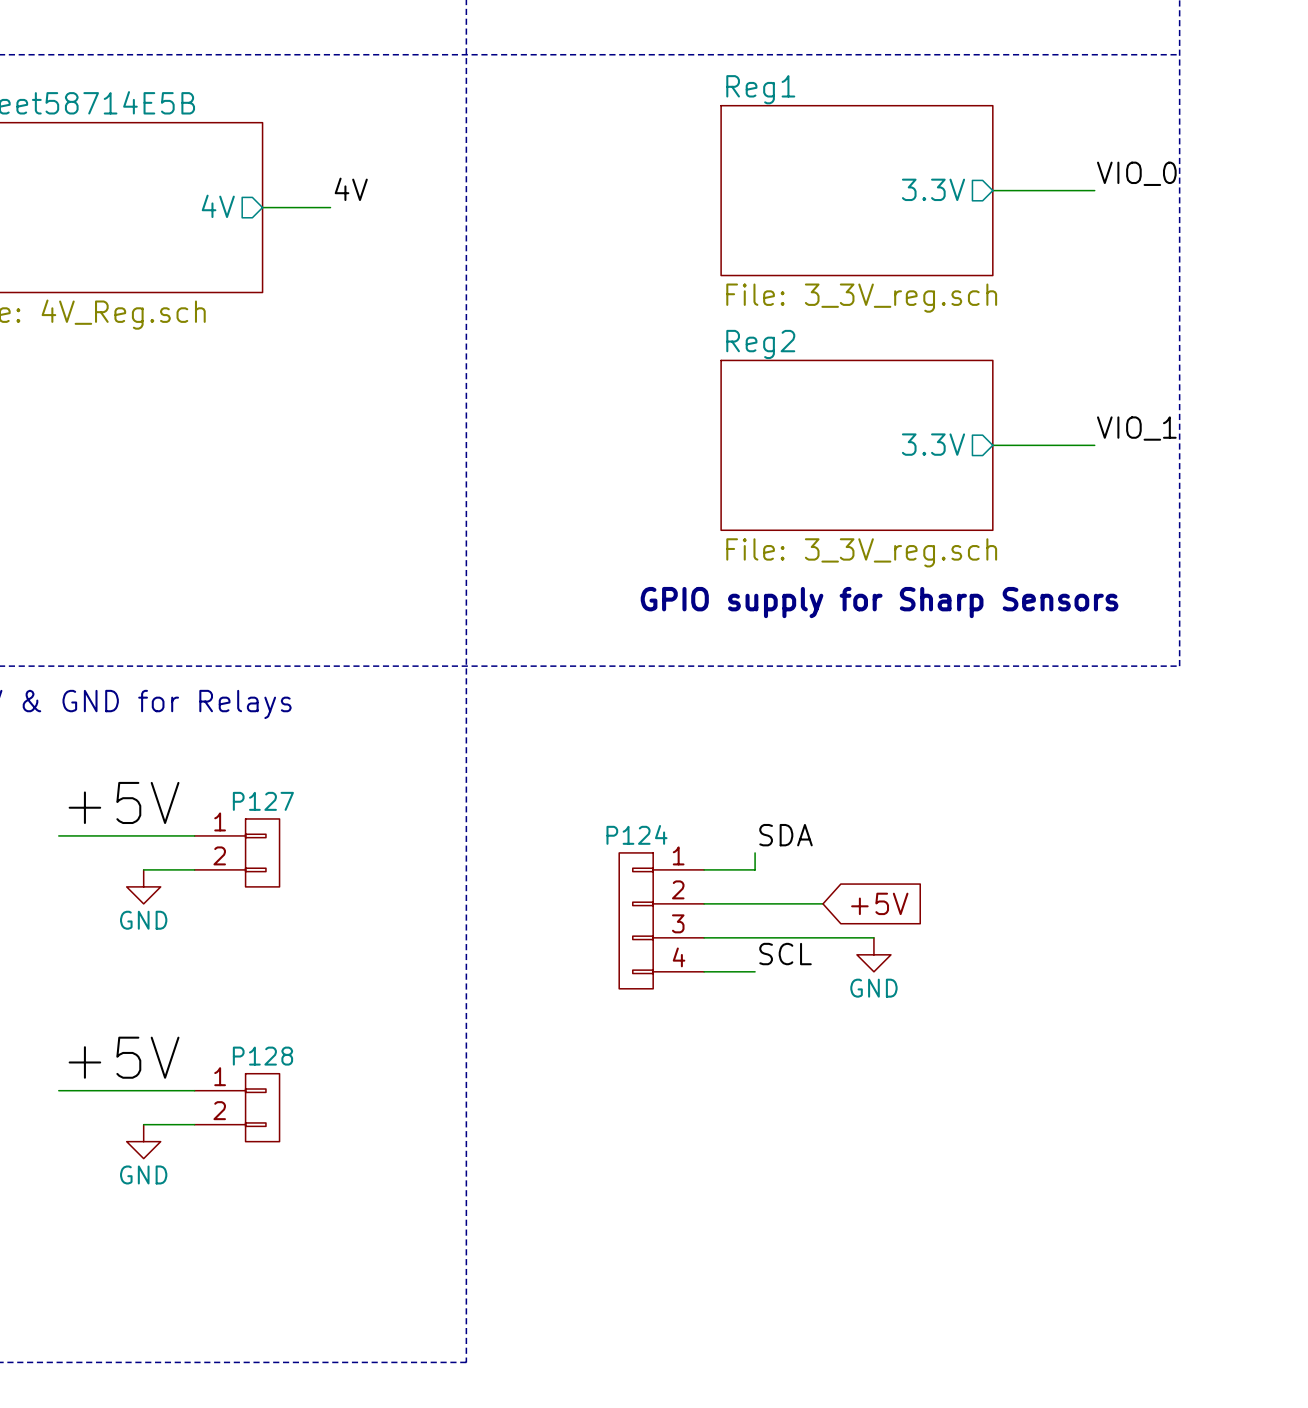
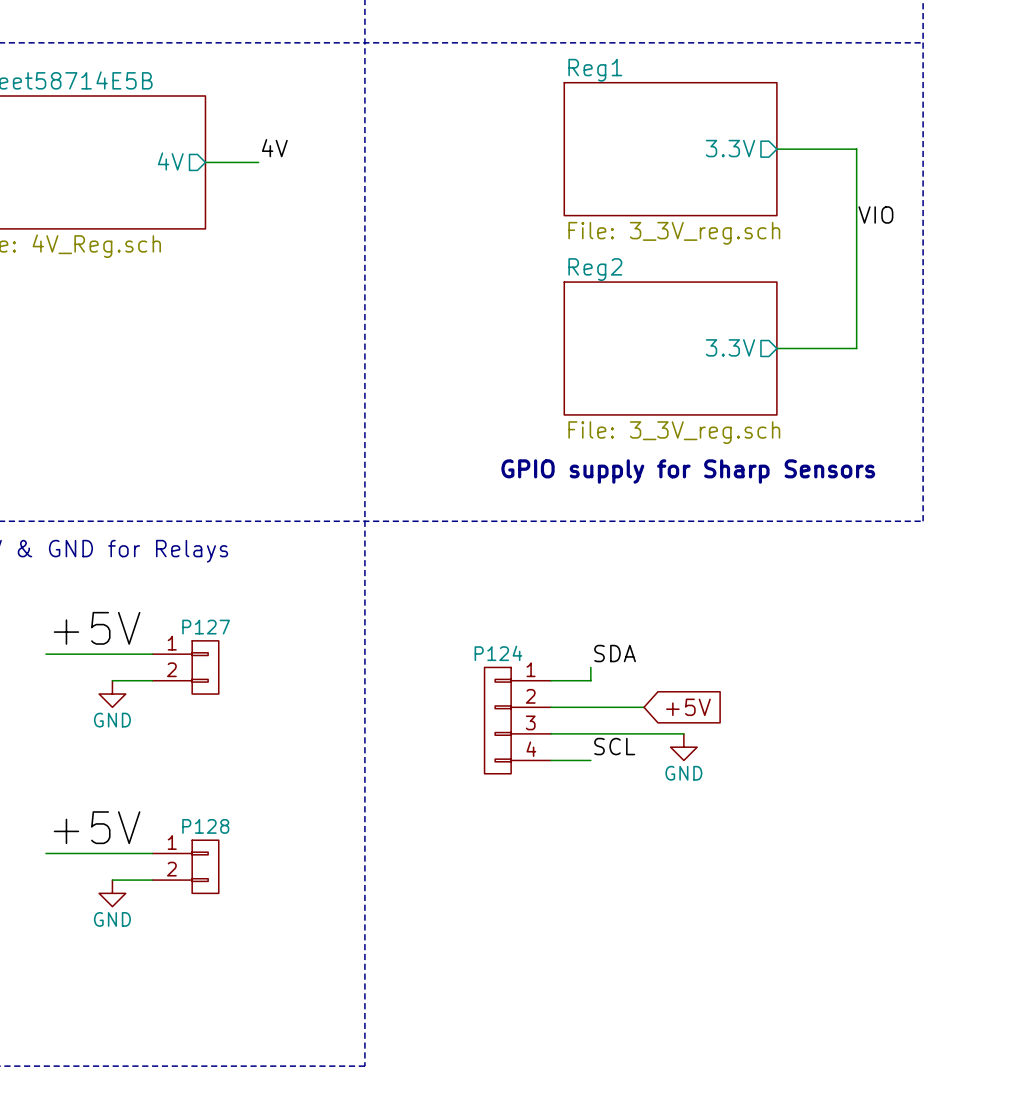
label: VIO_0 (1136, 173) -> none
wire: none -> (856, 149) (856, 348)
label: none -> VIO (875, 214)
label: VIO_1 (1136, 428) -> none

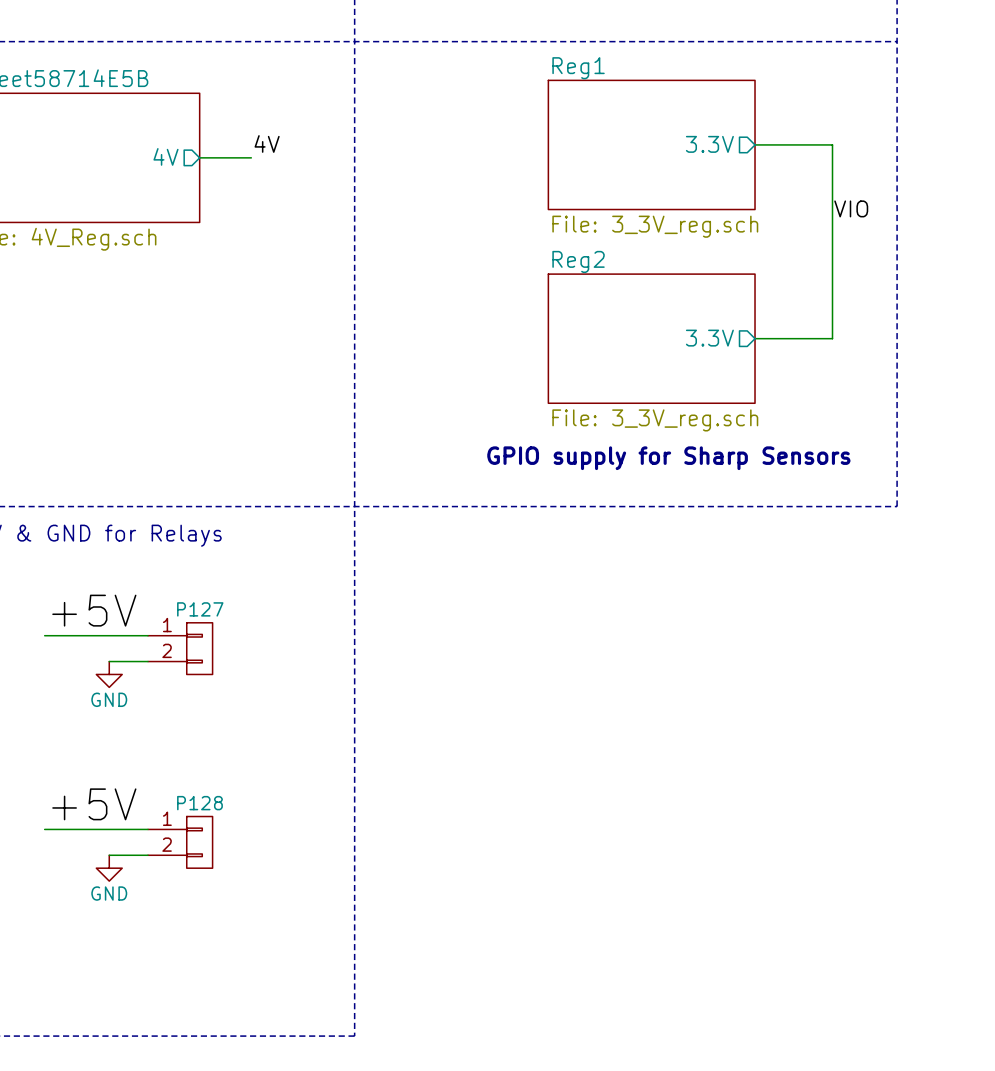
label: SDA (615, 653) -> none
wire: (590, 667) (590, 680) (550, 680) -> none
wire: (550, 707) (644, 707) -> none
global label: +5V (688, 707) -> none
P124: (517, 720) -> none
wire: (550, 733) (683, 733) -> none
label: SCL (614, 746) -> none
power symbol: GND (683, 747) -> none
wire: (550, 760) (590, 760) -> none

